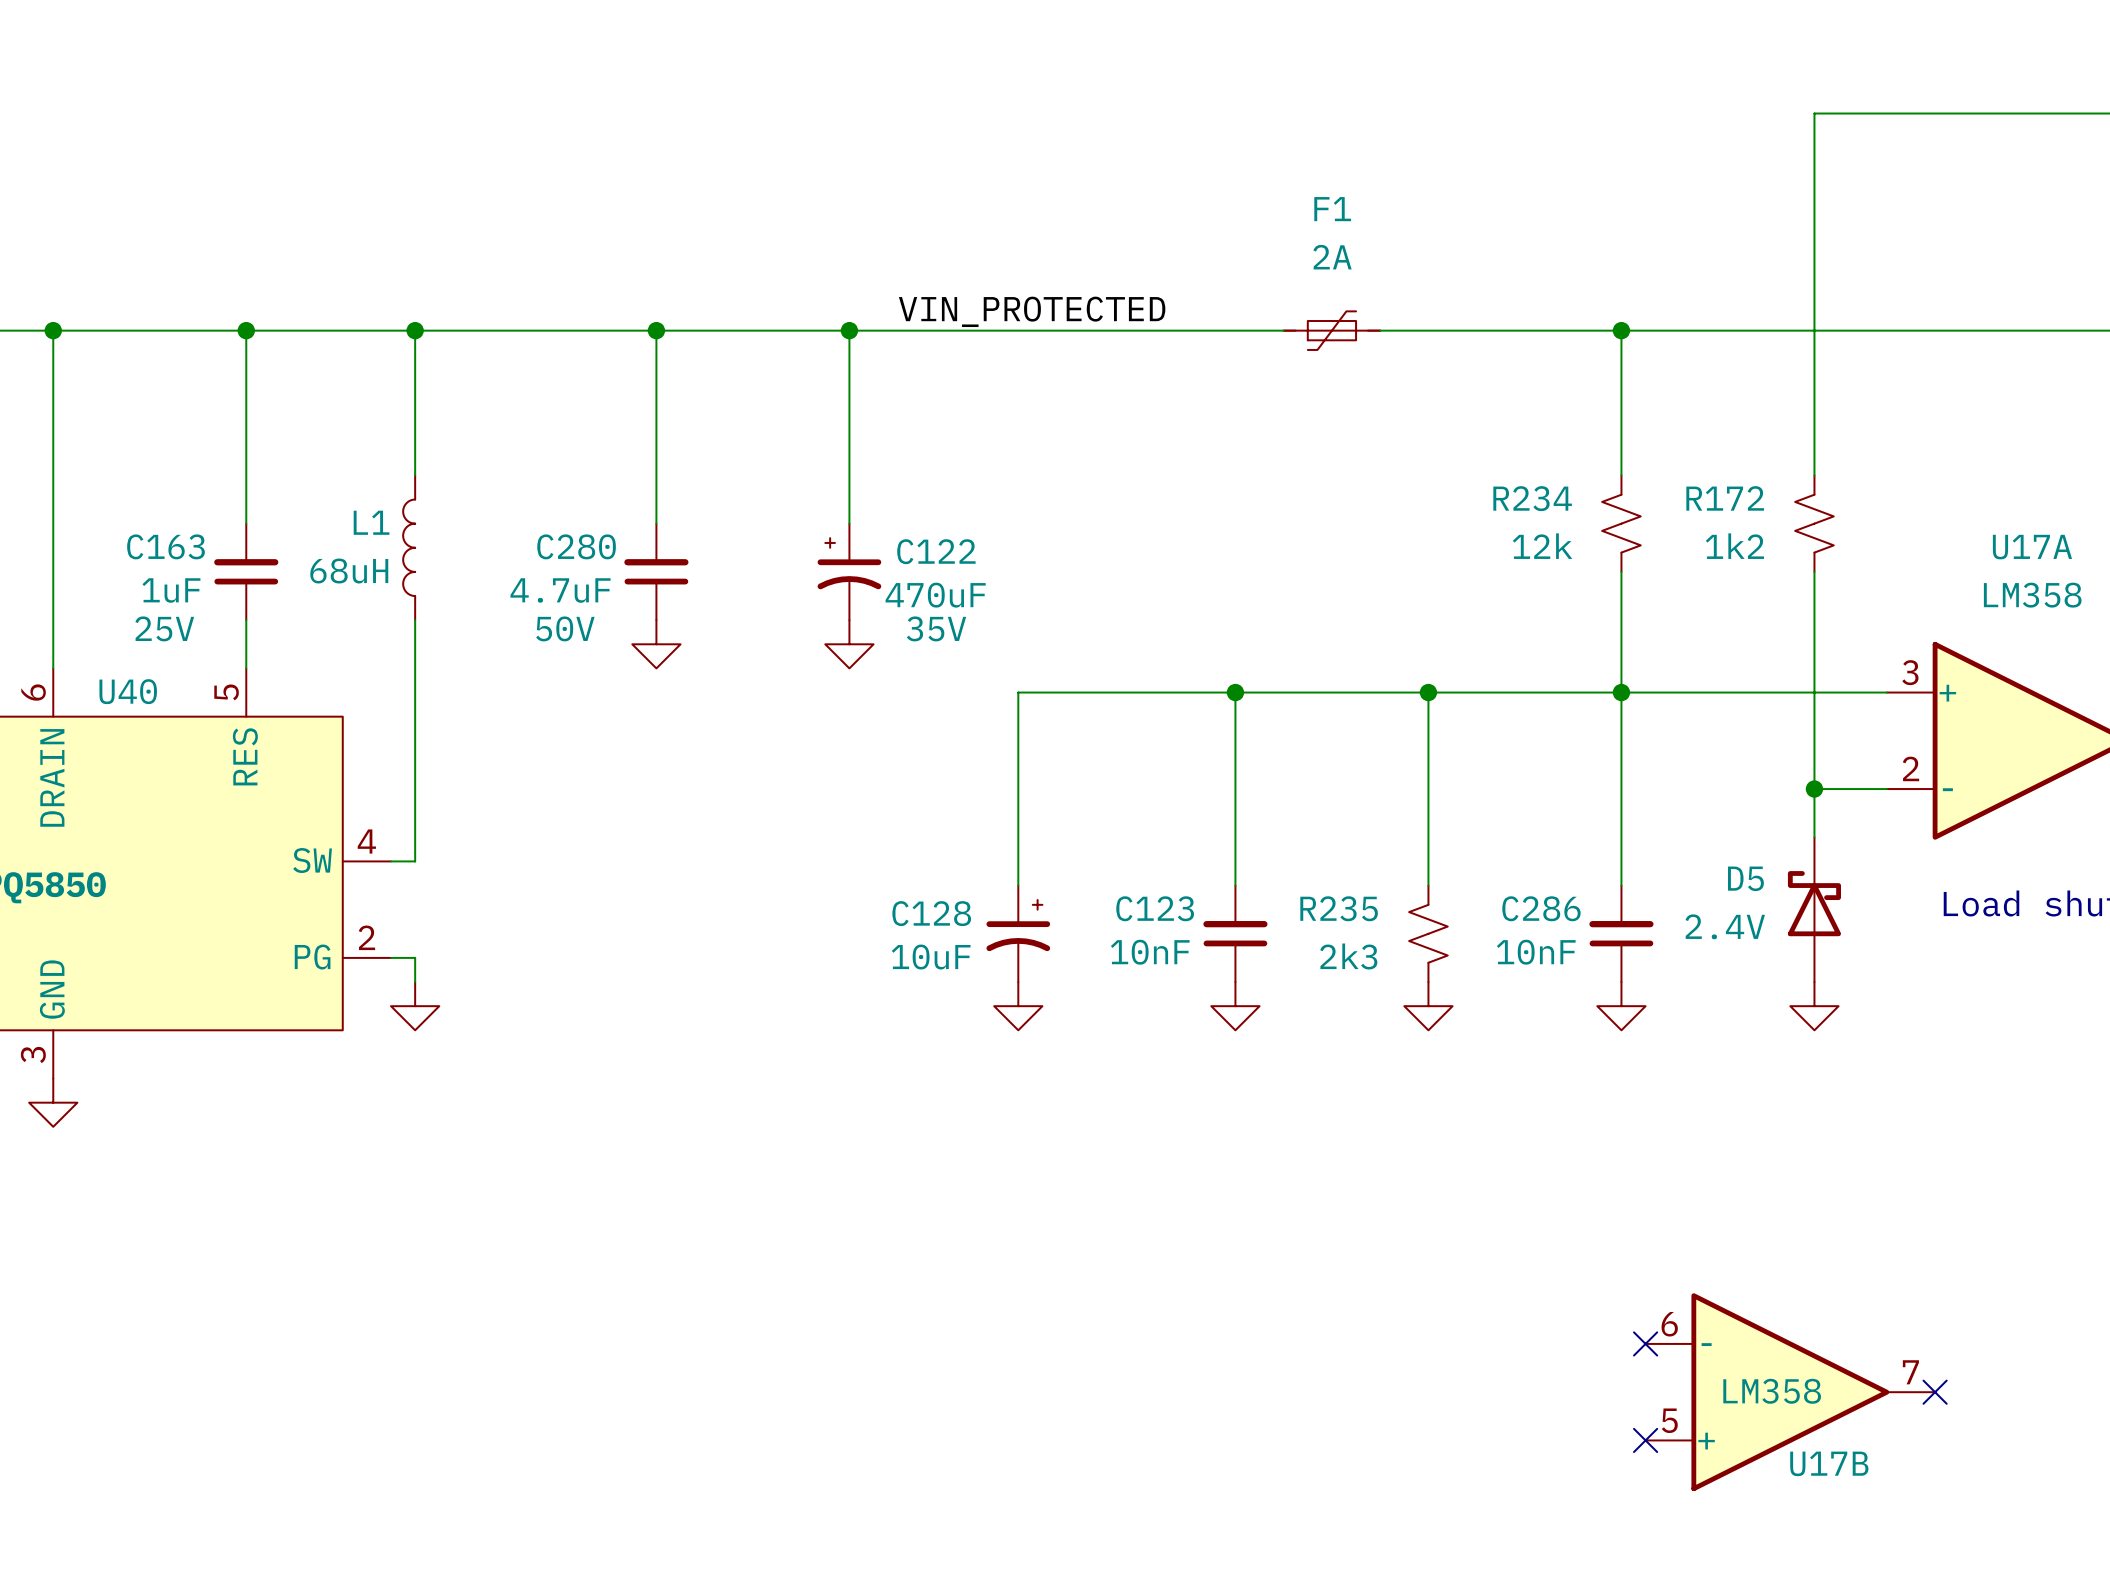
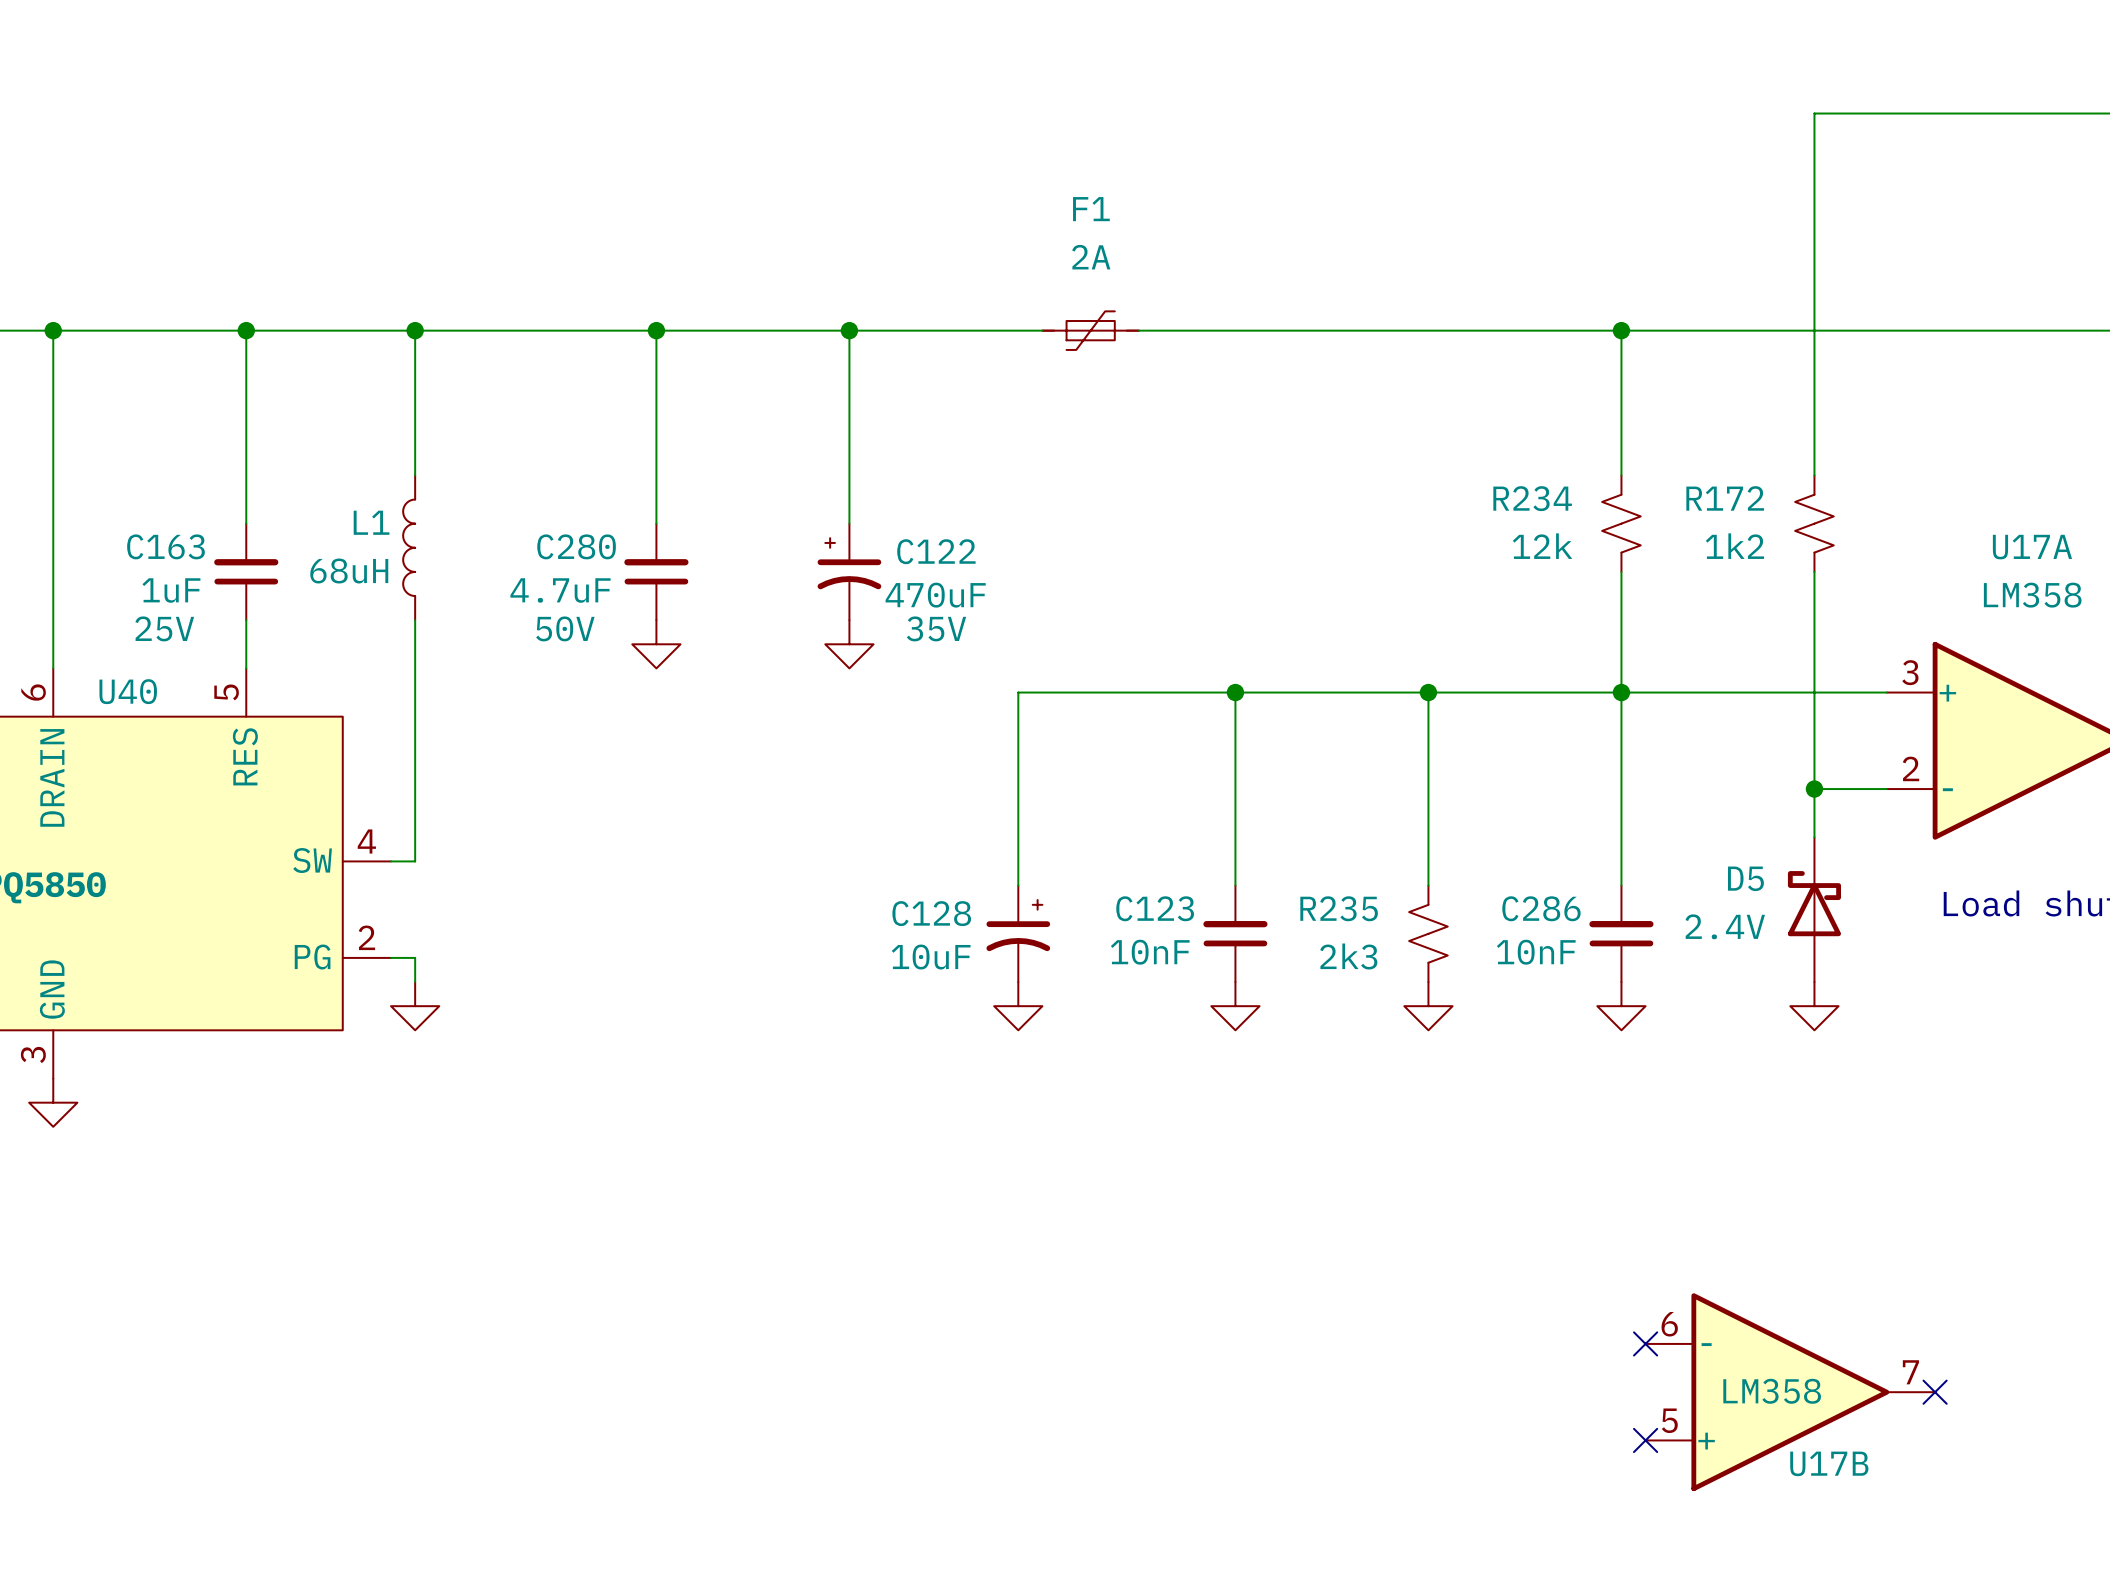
label: VIN_PROTECTED (1032, 311) -> none
F1 position: (1331, 330) -> (1090, 330)

